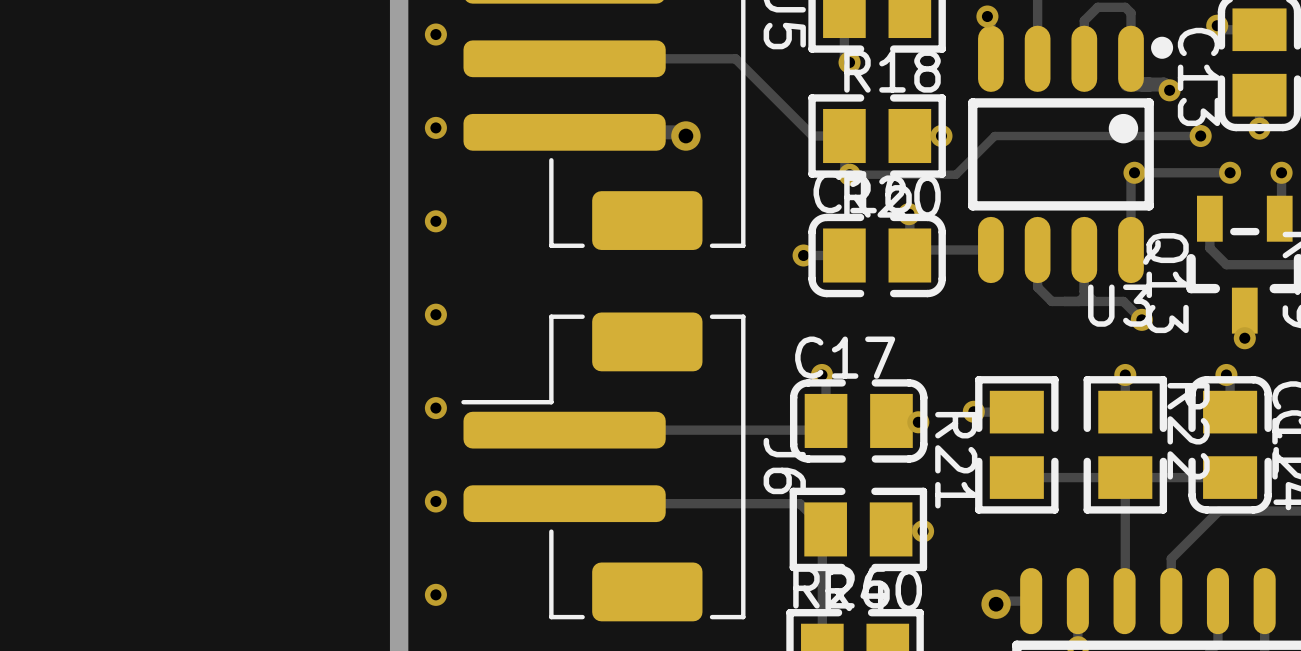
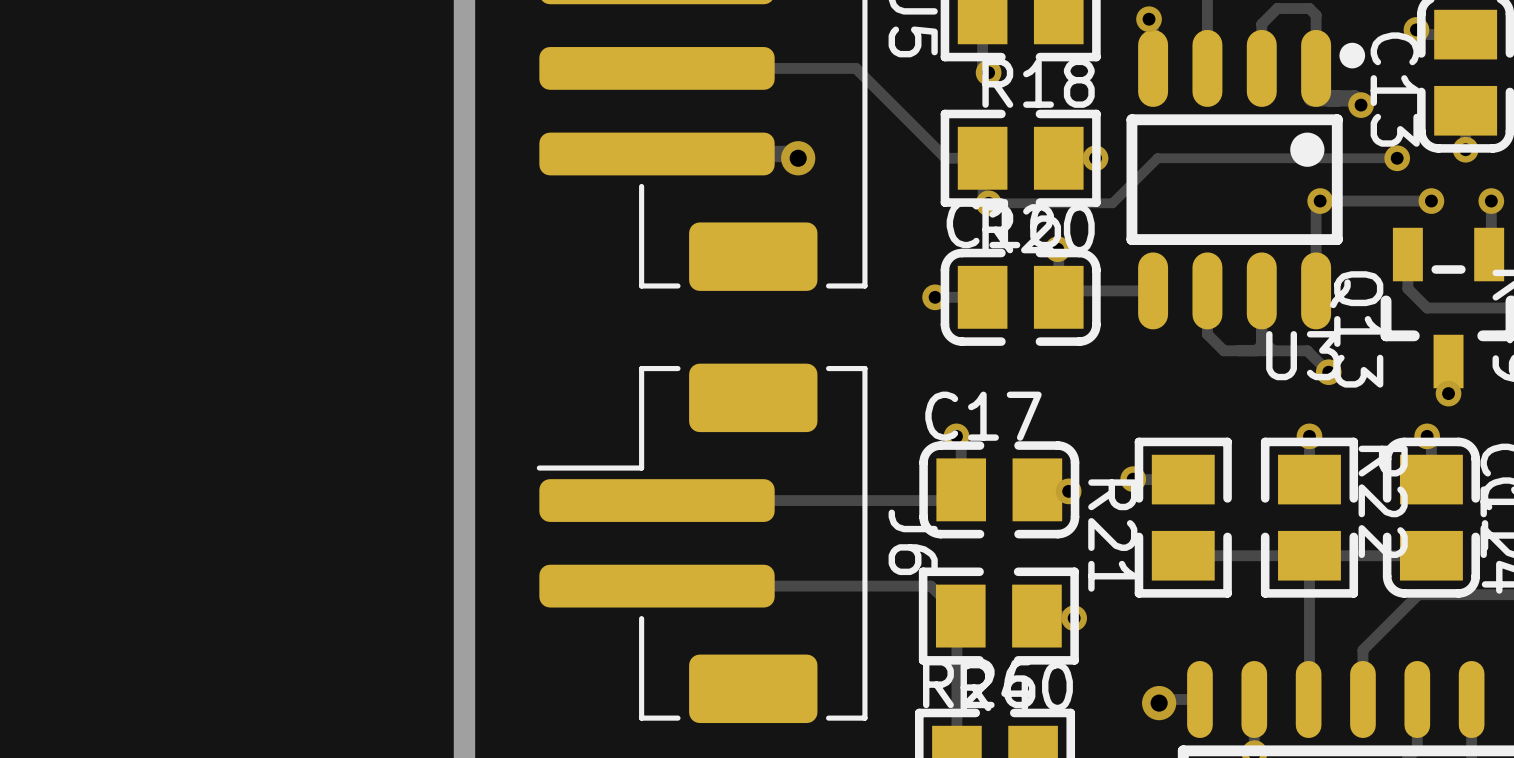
via: (435, 34) -> none
via: (435, 127) -> none
via: (435, 221) -> none
via: (435, 314) -> none
via: (435, 408) -> none
via: (435, 501) -> none
via: (435, 594) -> none

